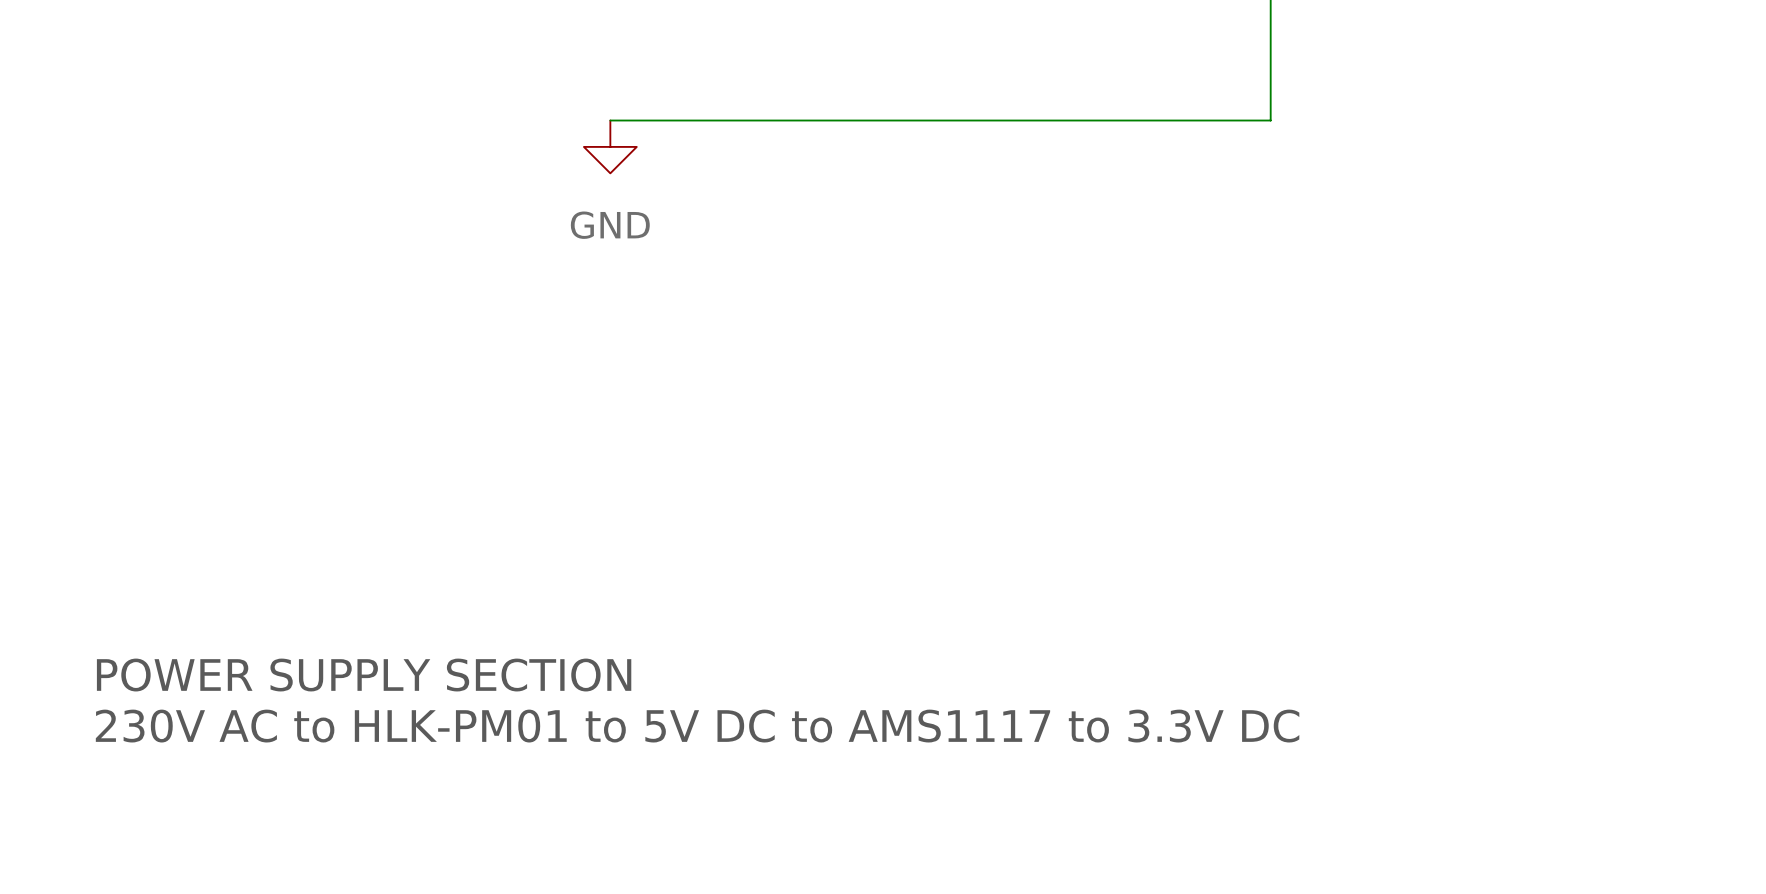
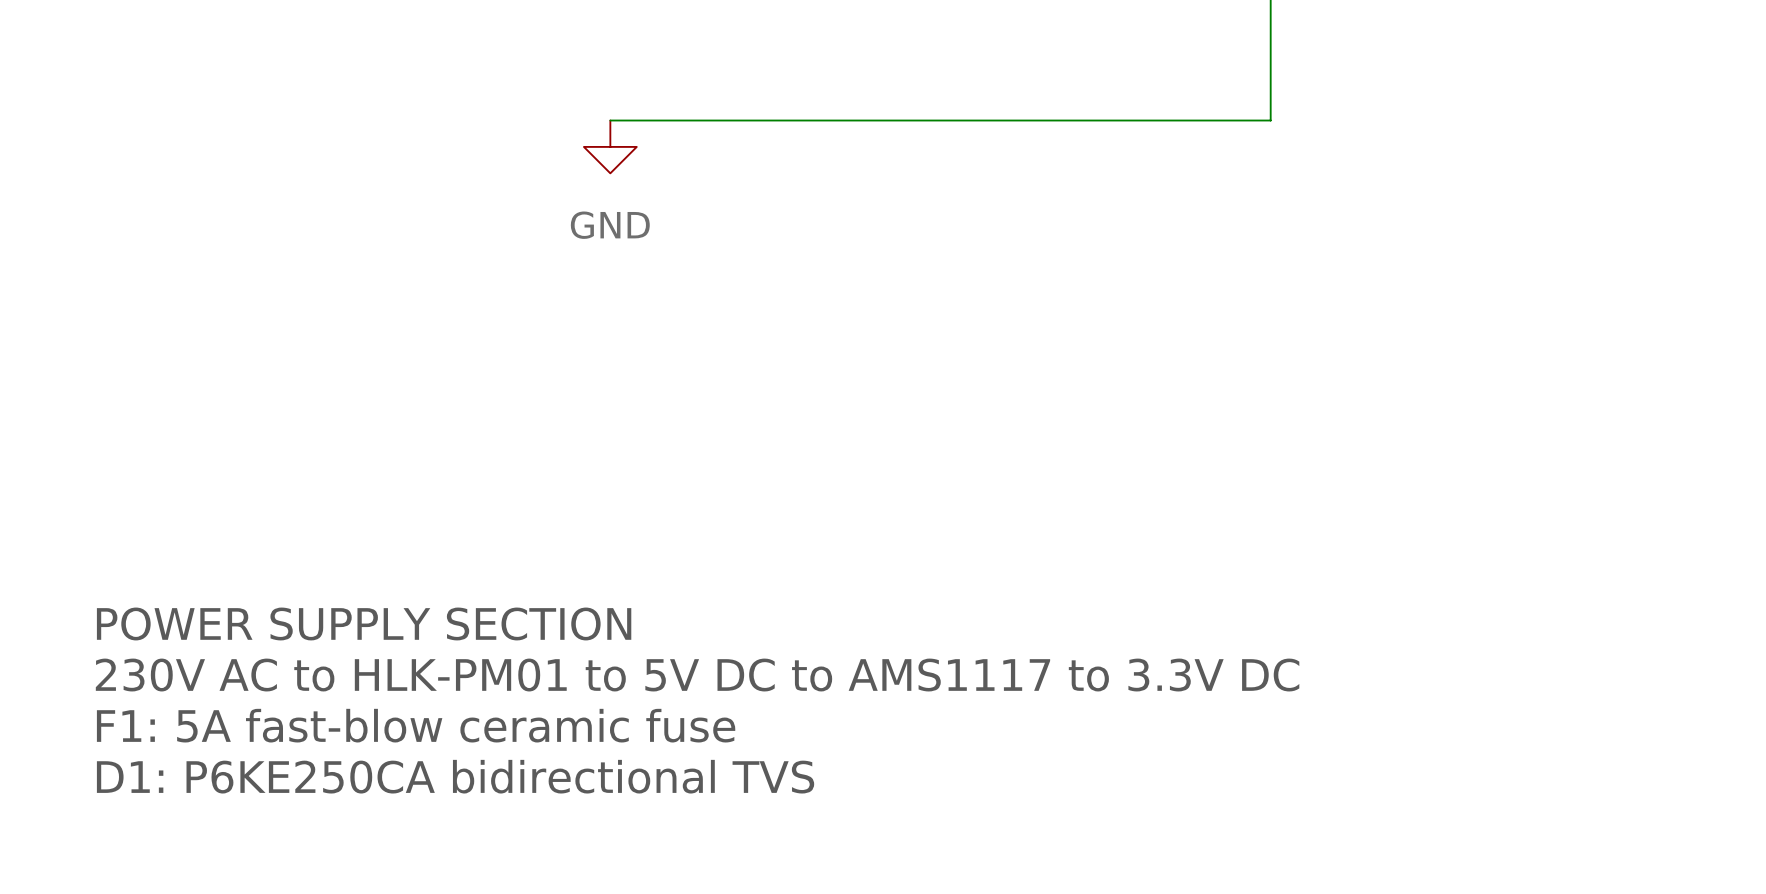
text: none -> POWER SUPPLY SECTION (364, 623)
text: POWER SUPPLY SECTION (364, 675) -> 230V AC to HLK-PM01 to 5V DC to AMS1117 to 3.3V DC (697, 675)
text: 230V AC to HLK-PM01 to 5V DC to AMS1117 to 3.3V DC (697, 726) -> F1: 5A fast-blow ceramic fuse (416, 725)
text: none -> D1: P6KE250CA bidirectional TVS (455, 776)

